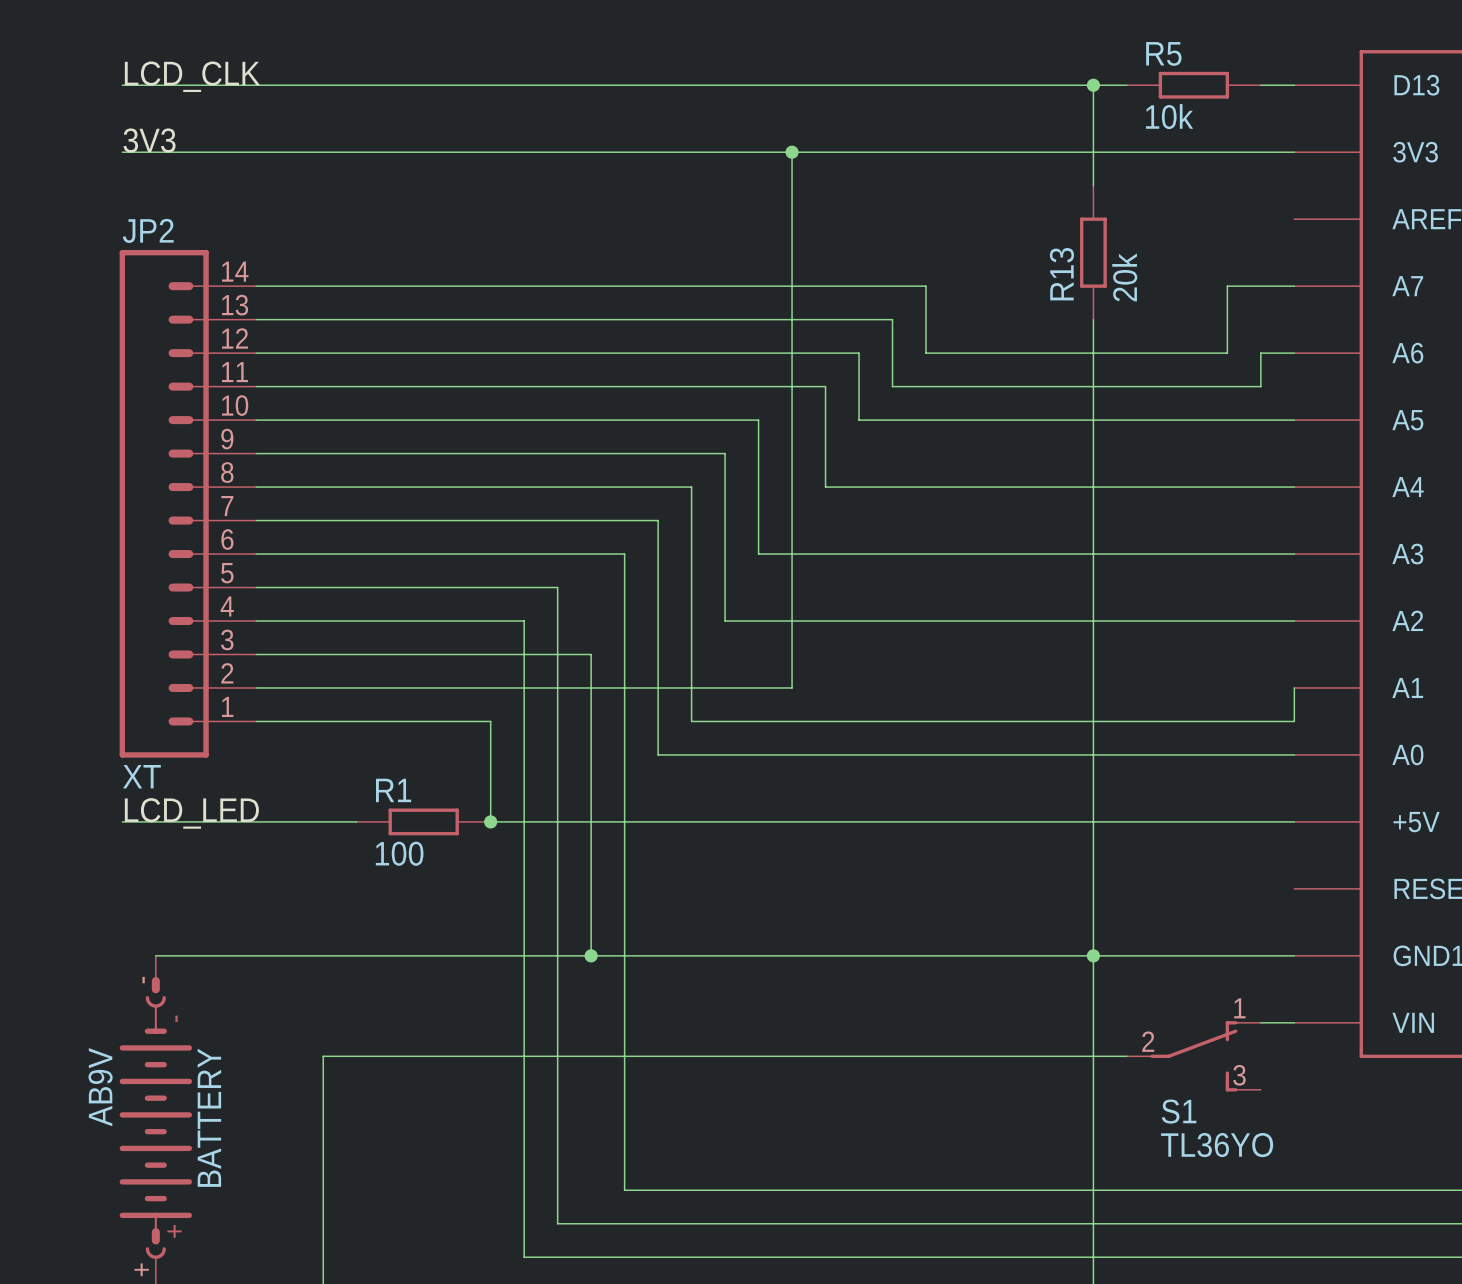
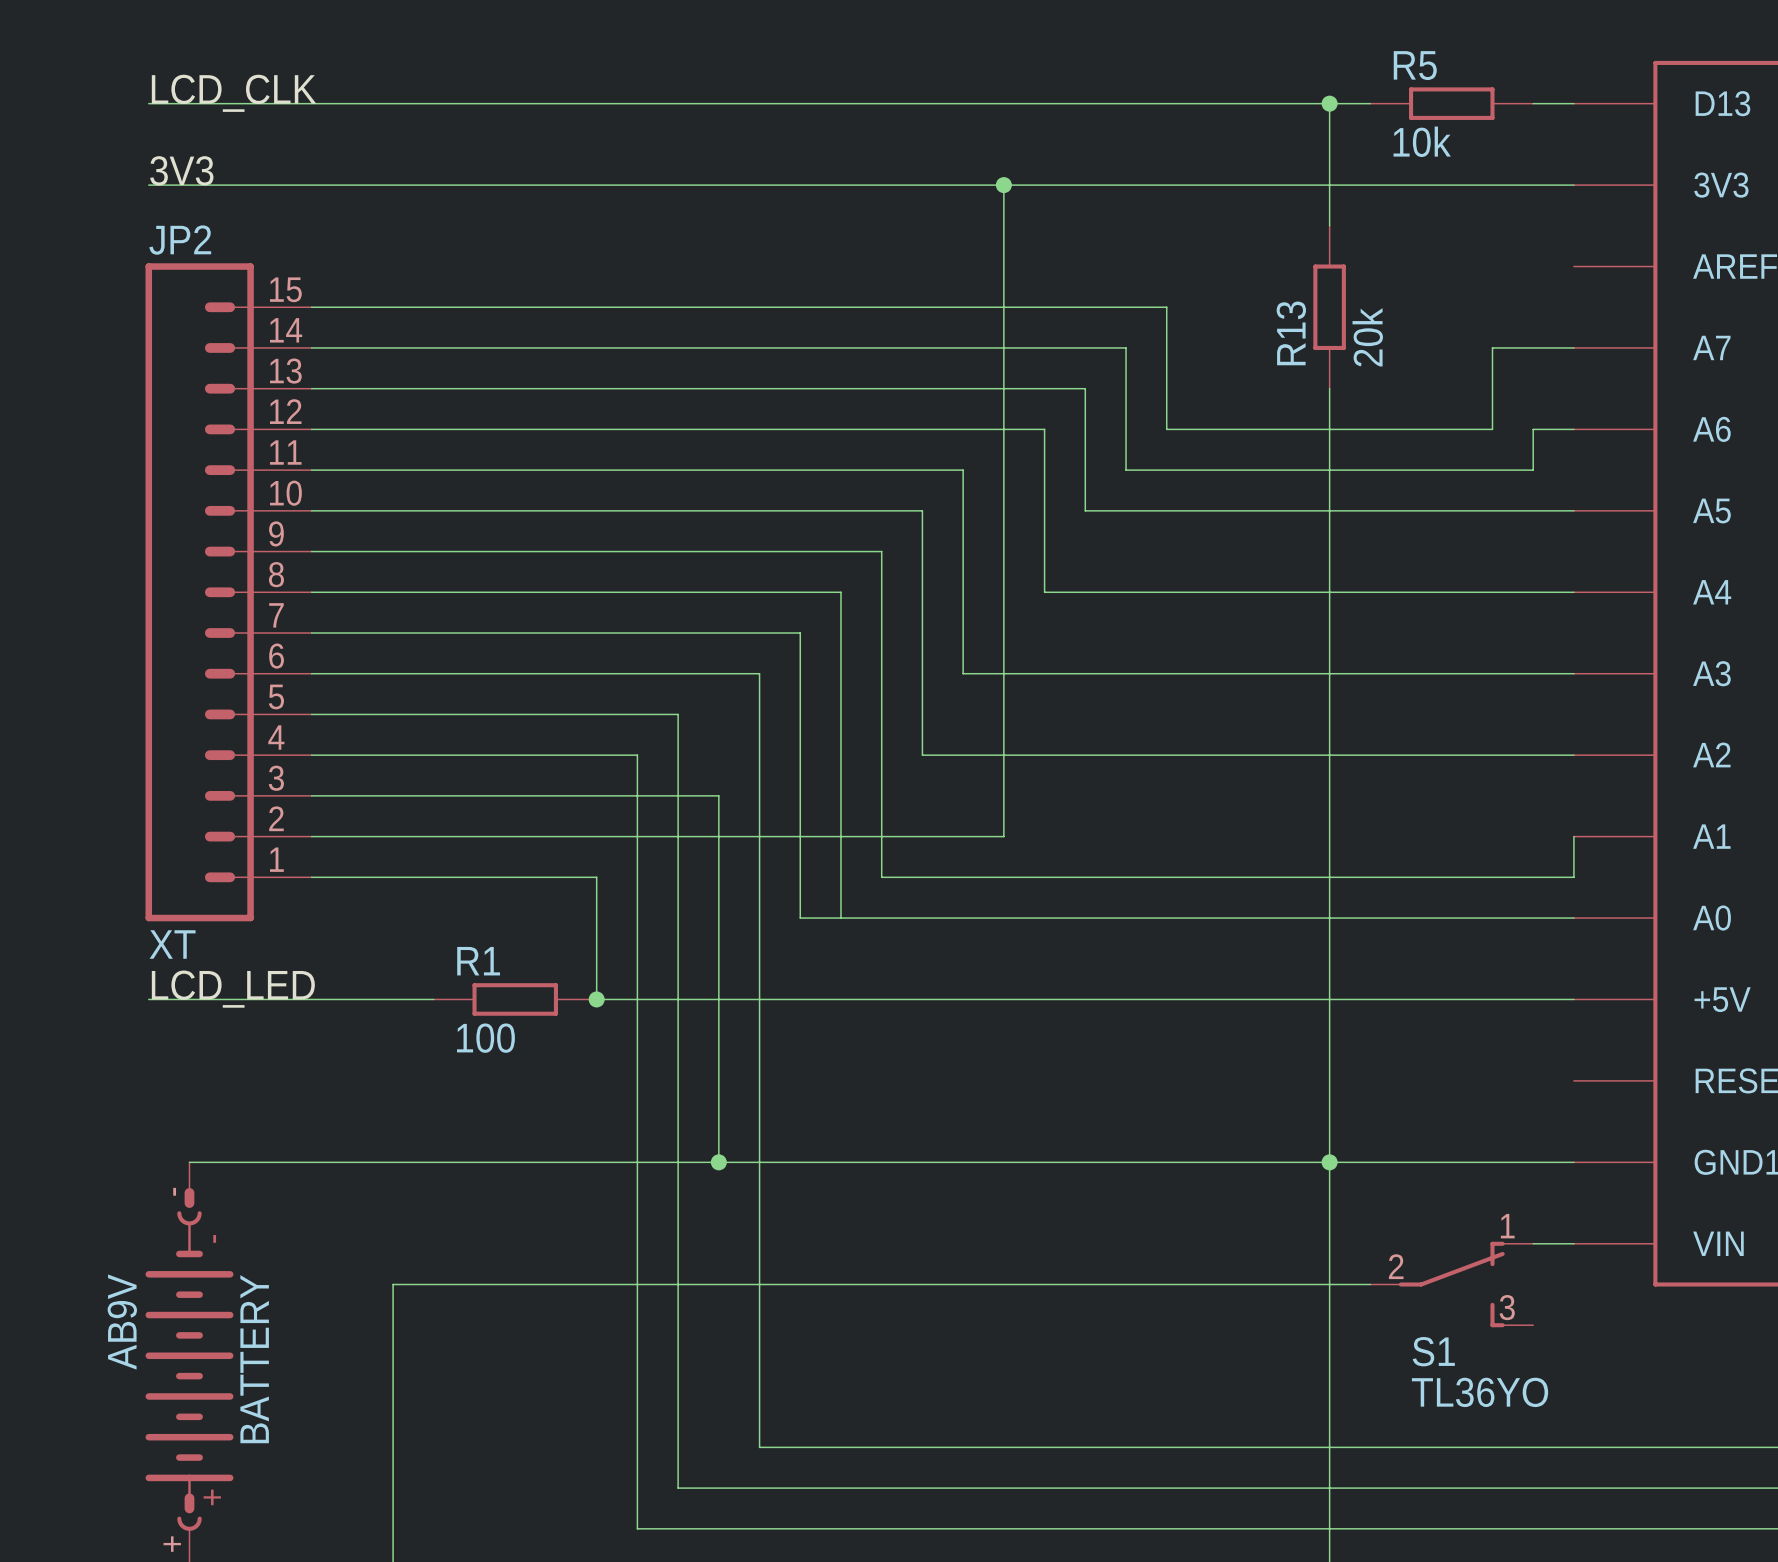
wire: (792, 152) (792, 386) (825, 386) -> (1003, 185) (1003, 470)
junction position: (792, 152) -> (1003, 185)
JP2 symbol: [119, 249, 257, 758] -> [145, 263, 312, 922]
wire: none -> (311, 307) (1166, 307) (1166, 429)
wire: (925, 353) (959, 353) -> (1126, 429) (1126, 470)
wire: (892, 386) (925, 386) -> (1085, 470) (1085, 510)
wire: (859, 420) (892, 420) -> none
wire: (825, 487) (859, 487) -> (1044, 510) (1044, 592)
wire: (758, 554) (792, 554) (792, 687) -> (1003, 592) (1003, 836) (963, 836)
wire: (725, 621) (758, 621) -> (922, 673) (922, 755)
wire: none -> (881, 755) (881, 877)
wire: (691, 721) (725, 721) -> (840, 877) (840, 918)

